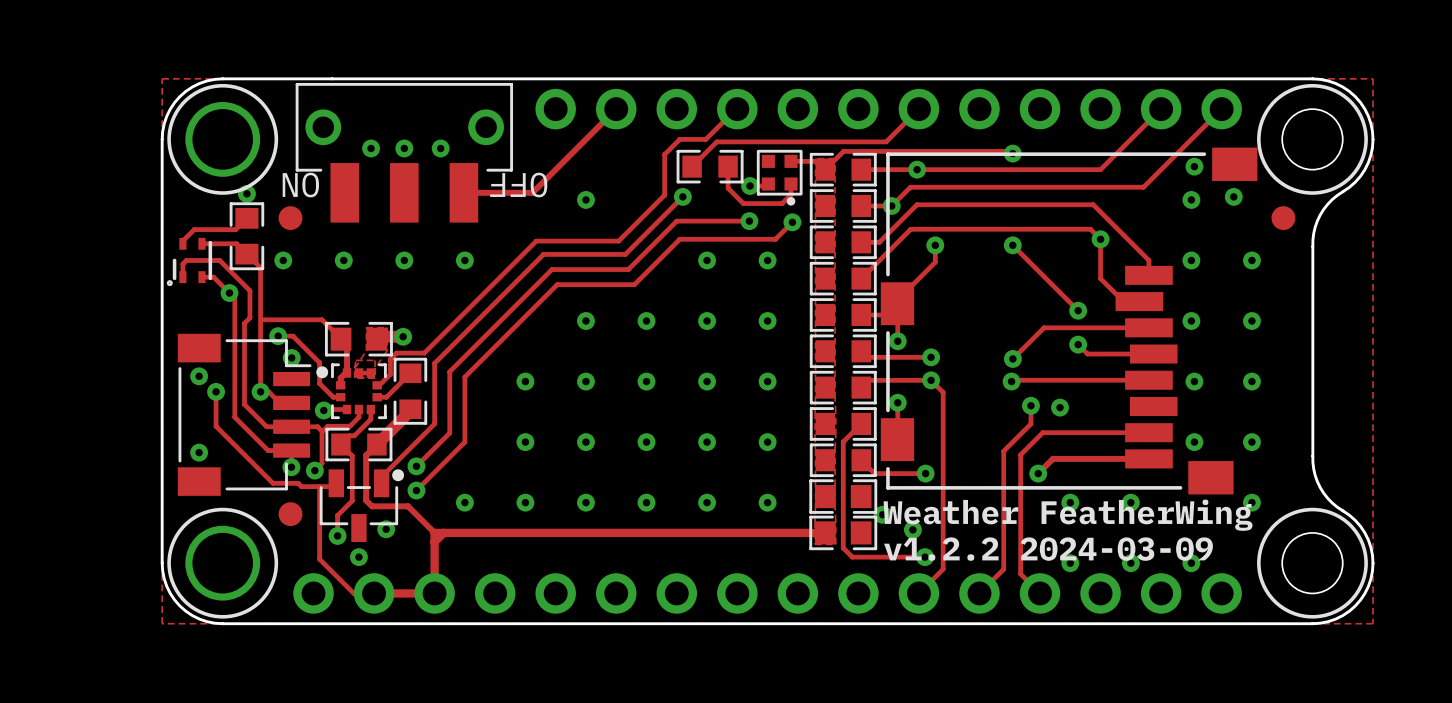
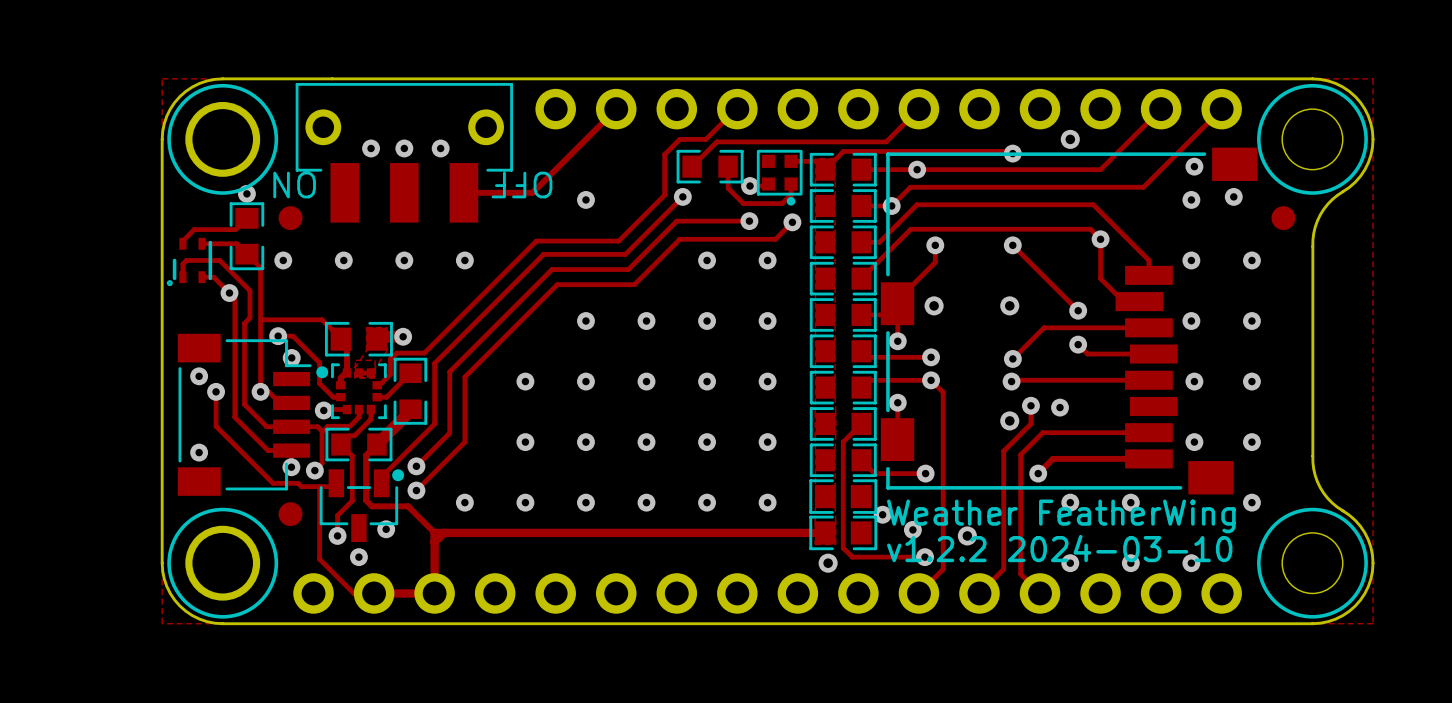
via: none -> (1070, 139)
via: none -> (934, 305)
via: none -> (1009, 305)
via: none -> (1009, 420)
via: none -> (967, 535)
text: v1.2.2 2024-03-09 (1048, 549) -> v1.2.2 2024-03-10 (1059, 548)
via: none -> (828, 563)

